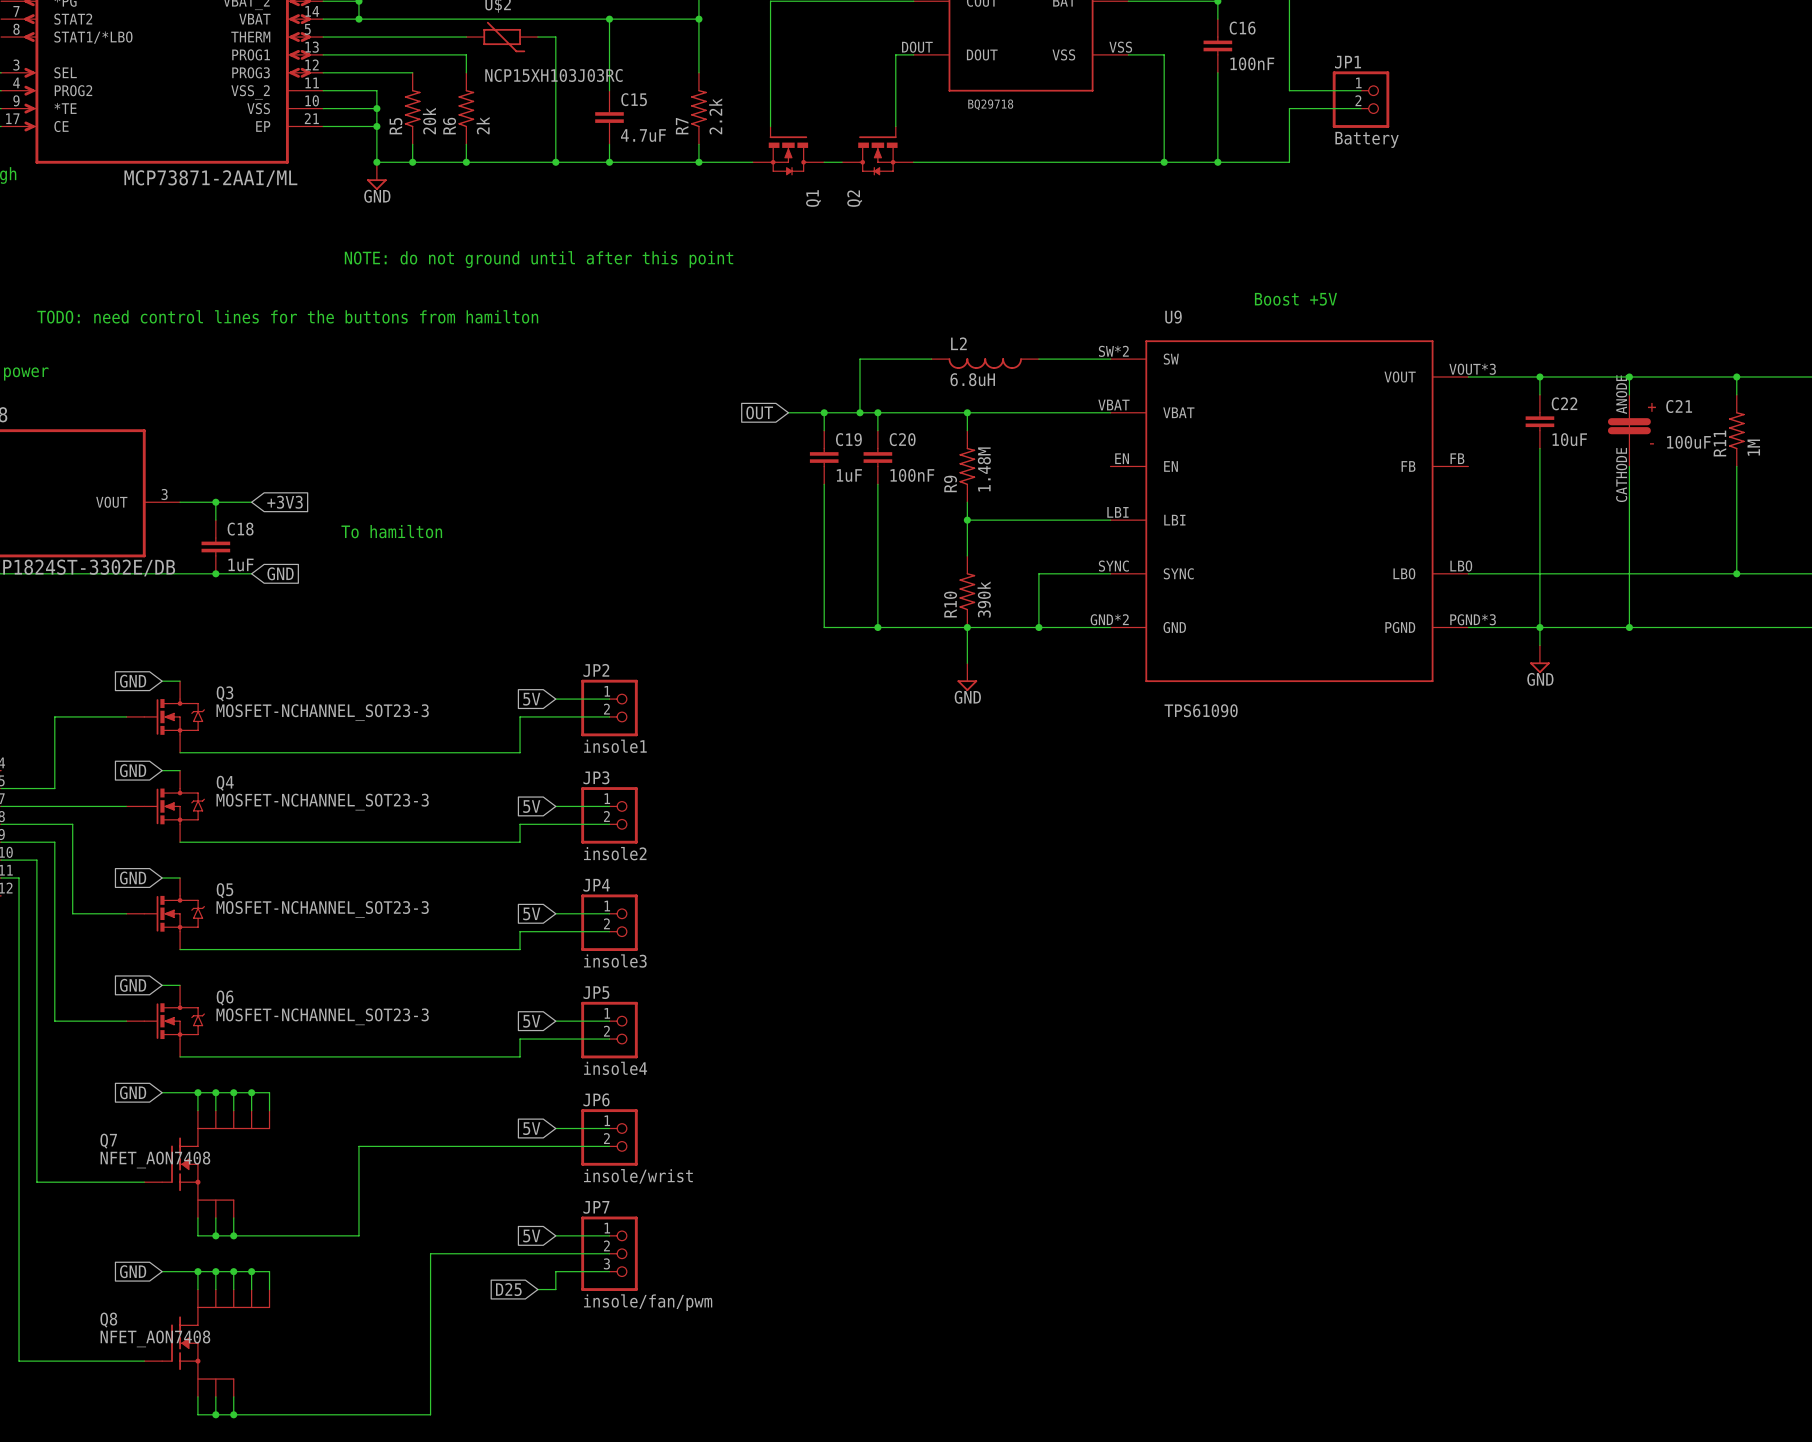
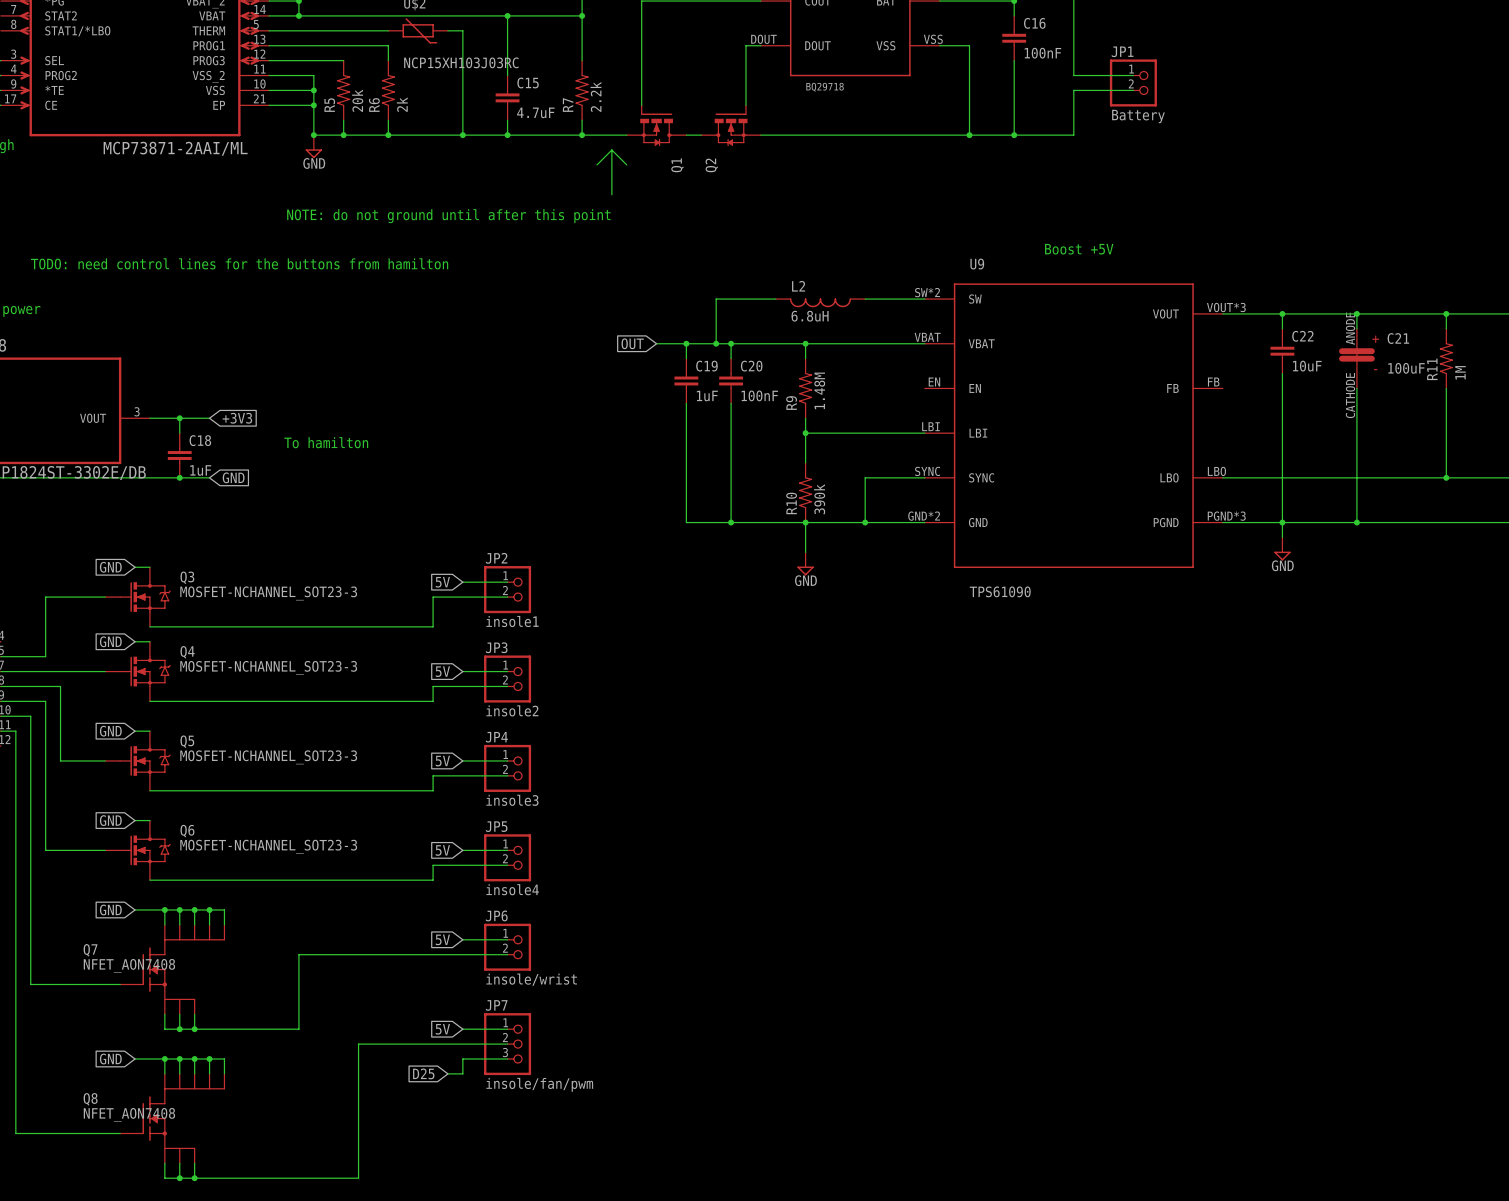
wire: none -> (611, 150) (611, 194)
wire: none -> (611, 150) (596, 164)
wire: none -> (611, 150) (626, 164)

